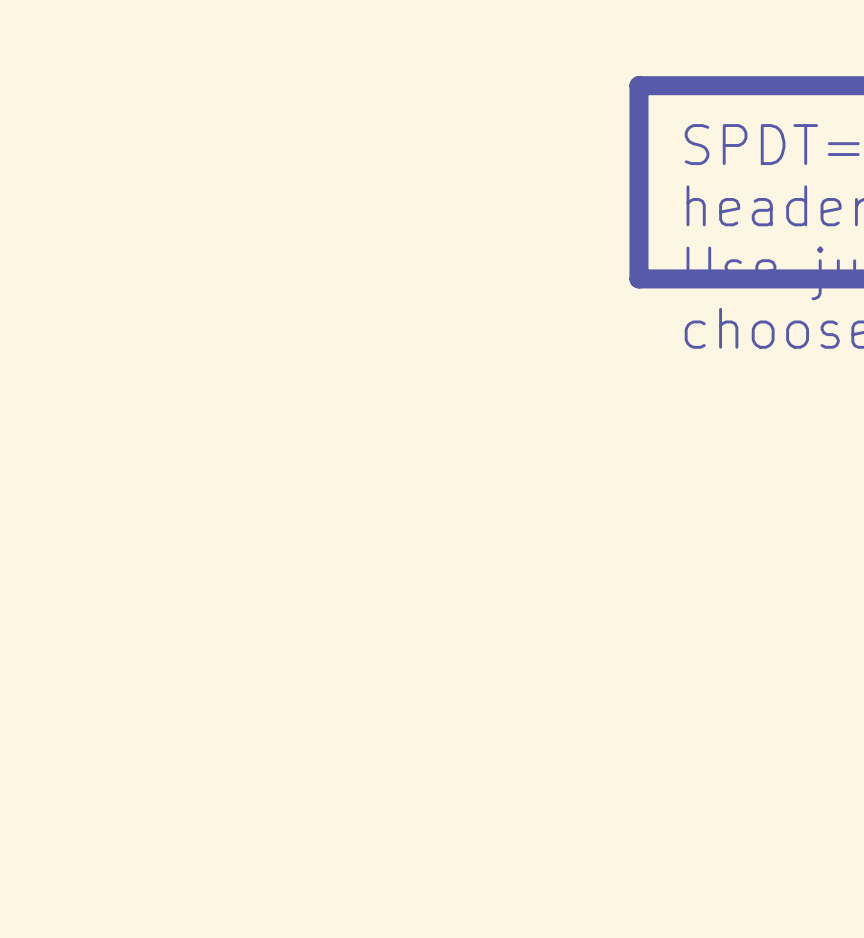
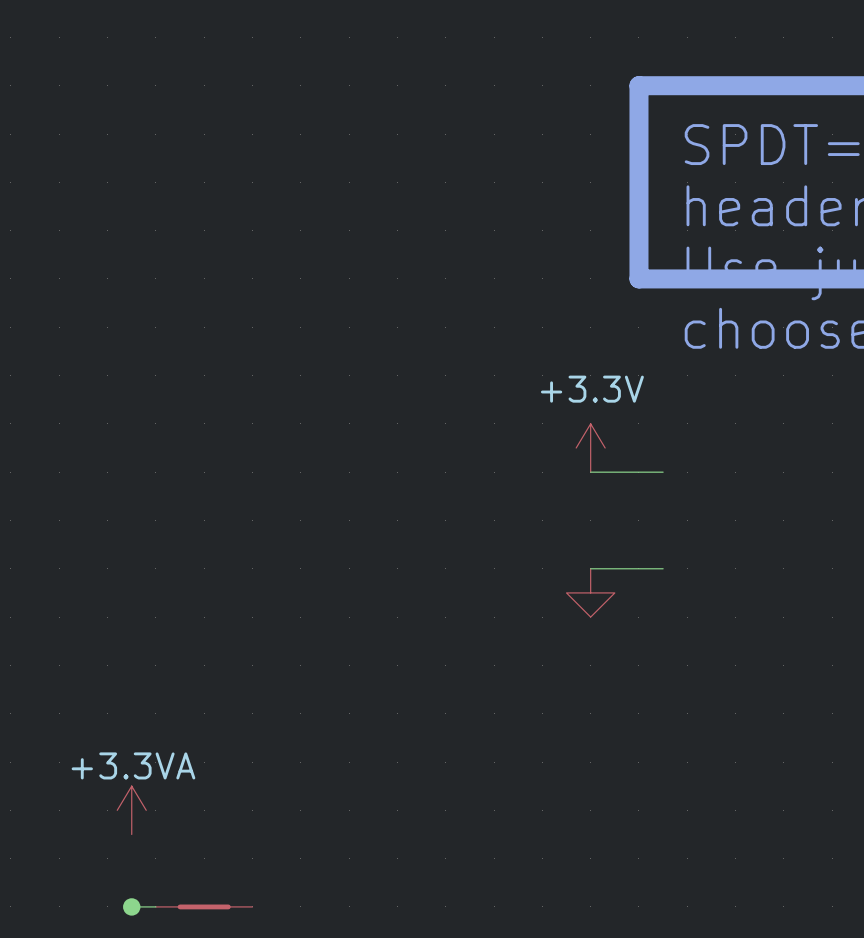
power symbol: none -> +3.3V (590, 448)
wire: none -> (590, 472) (663, 472)
wire: none -> (590, 568) (663, 568)
power symbol: none -> (590, 592)
power symbol: none -> +3.3VA (131, 810)
wire: none -> (131, 906) (155, 906)
junction: none -> (131, 906)
part: none -> (204, 906)

